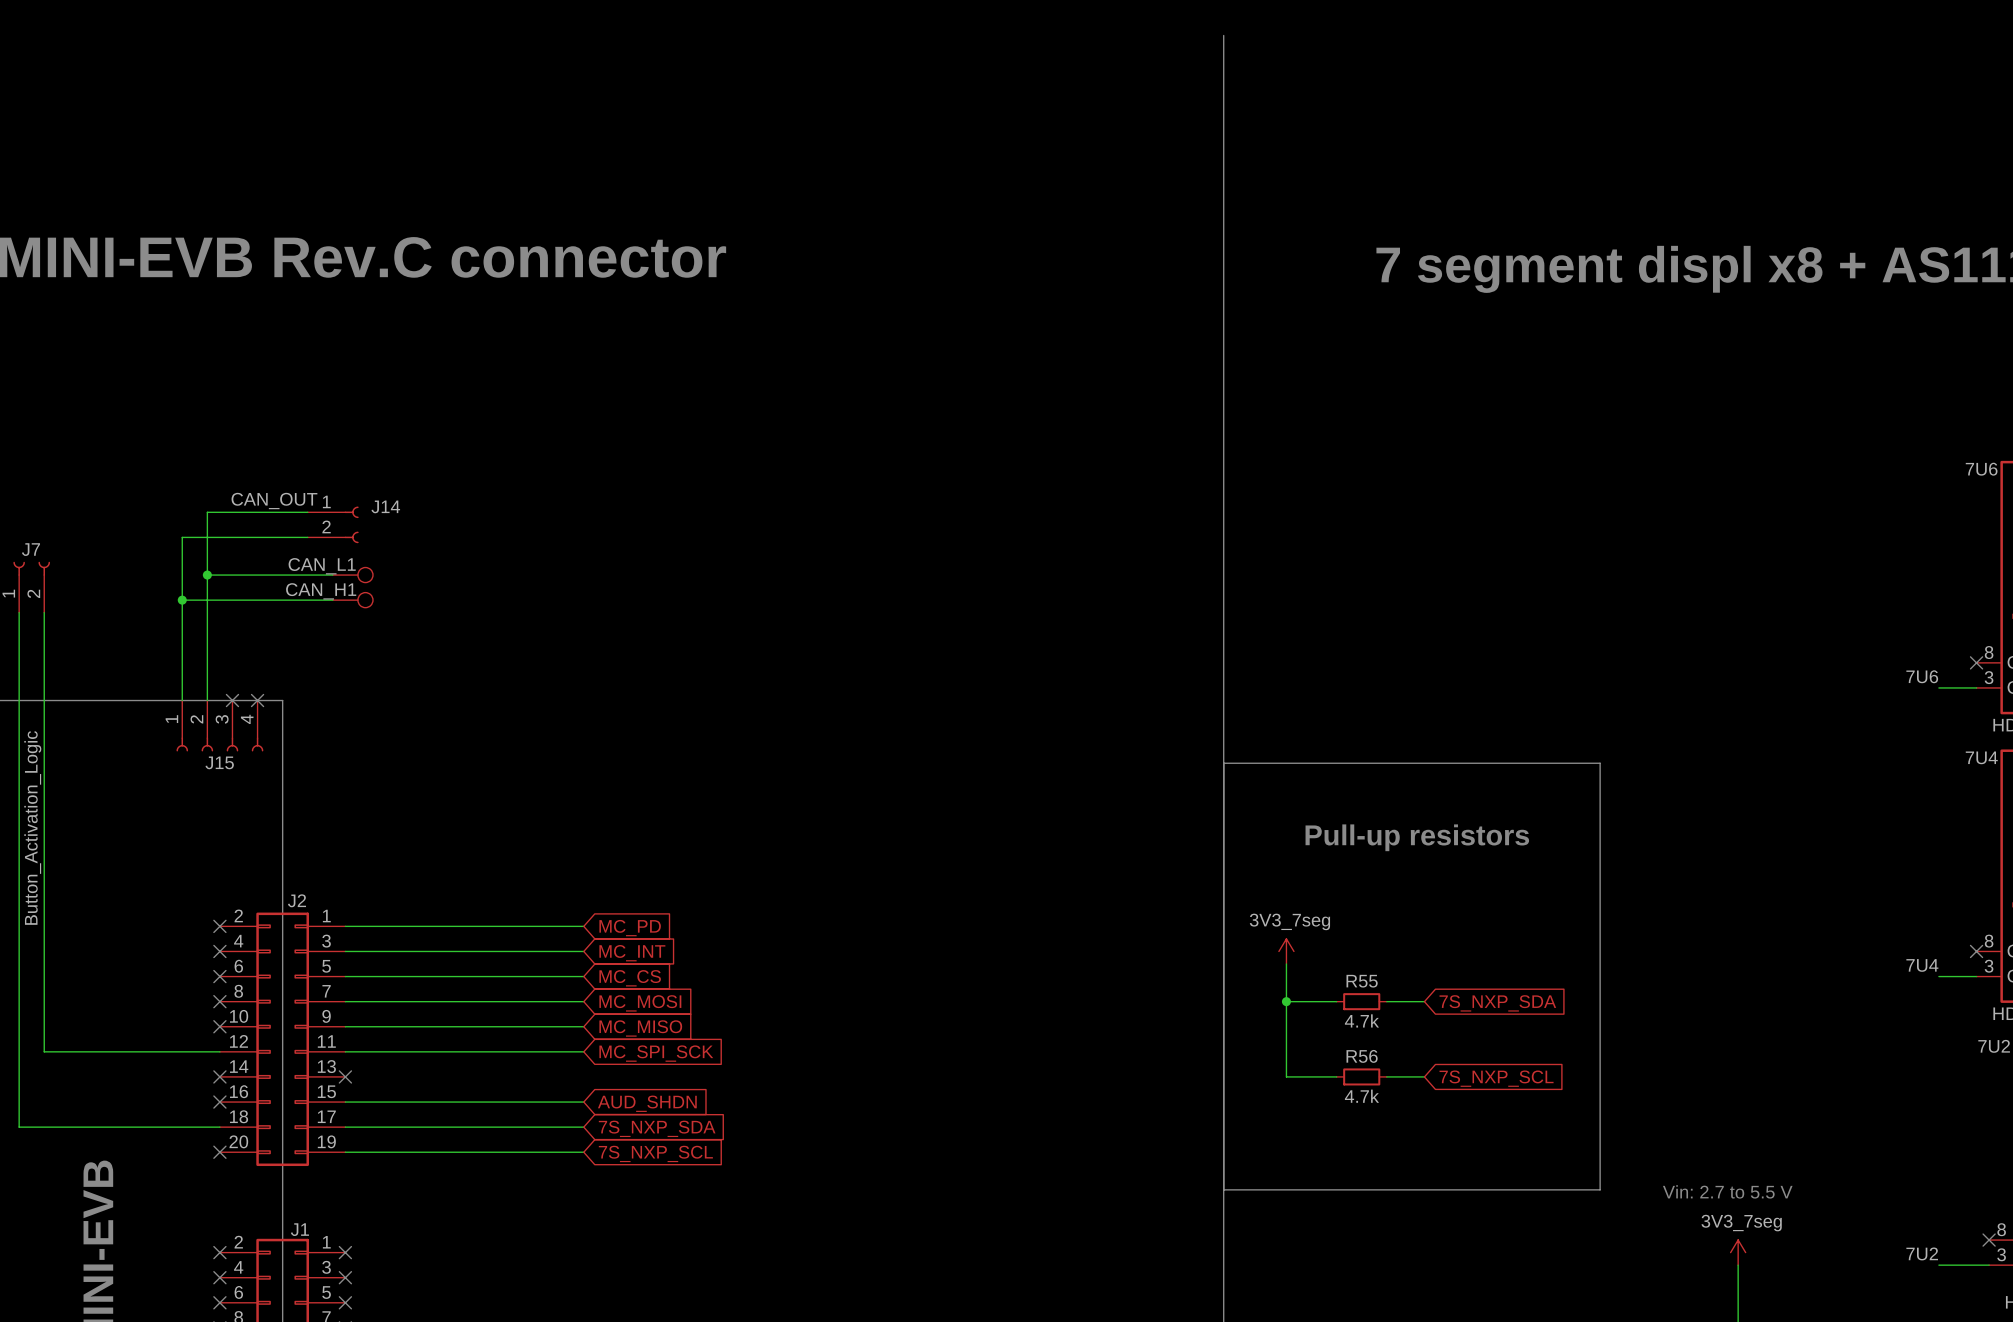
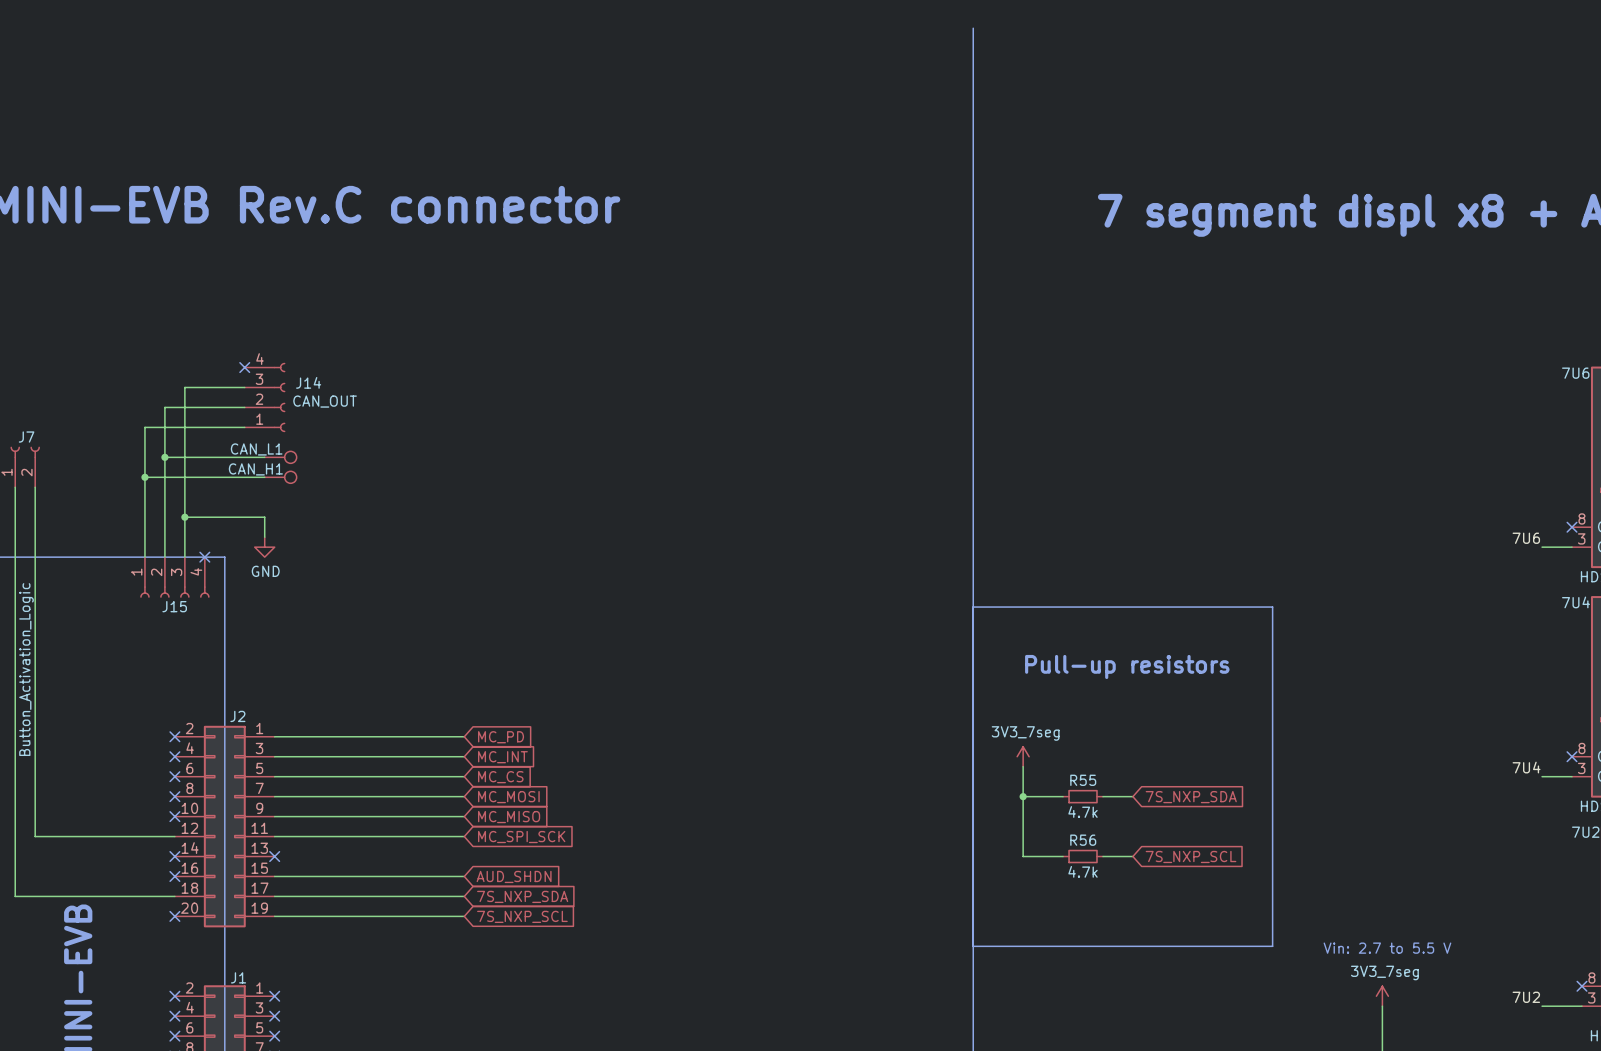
no-connect mark: none -> (244, 367)
wire: none -> (244, 387) (184, 387) (184, 557)
J14 value position: CAN_OUT (274, 501) -> CAN_OUT (325, 401)
J14 symbol: [307, 506, 359, 544] -> [244, 362, 286, 433]
wire: none -> (184, 517) (264, 517) (264, 537)
junction: none -> (184, 517)
power symbol: none -> GND (264, 547)
no-connect mark: (232, 700) -> none

